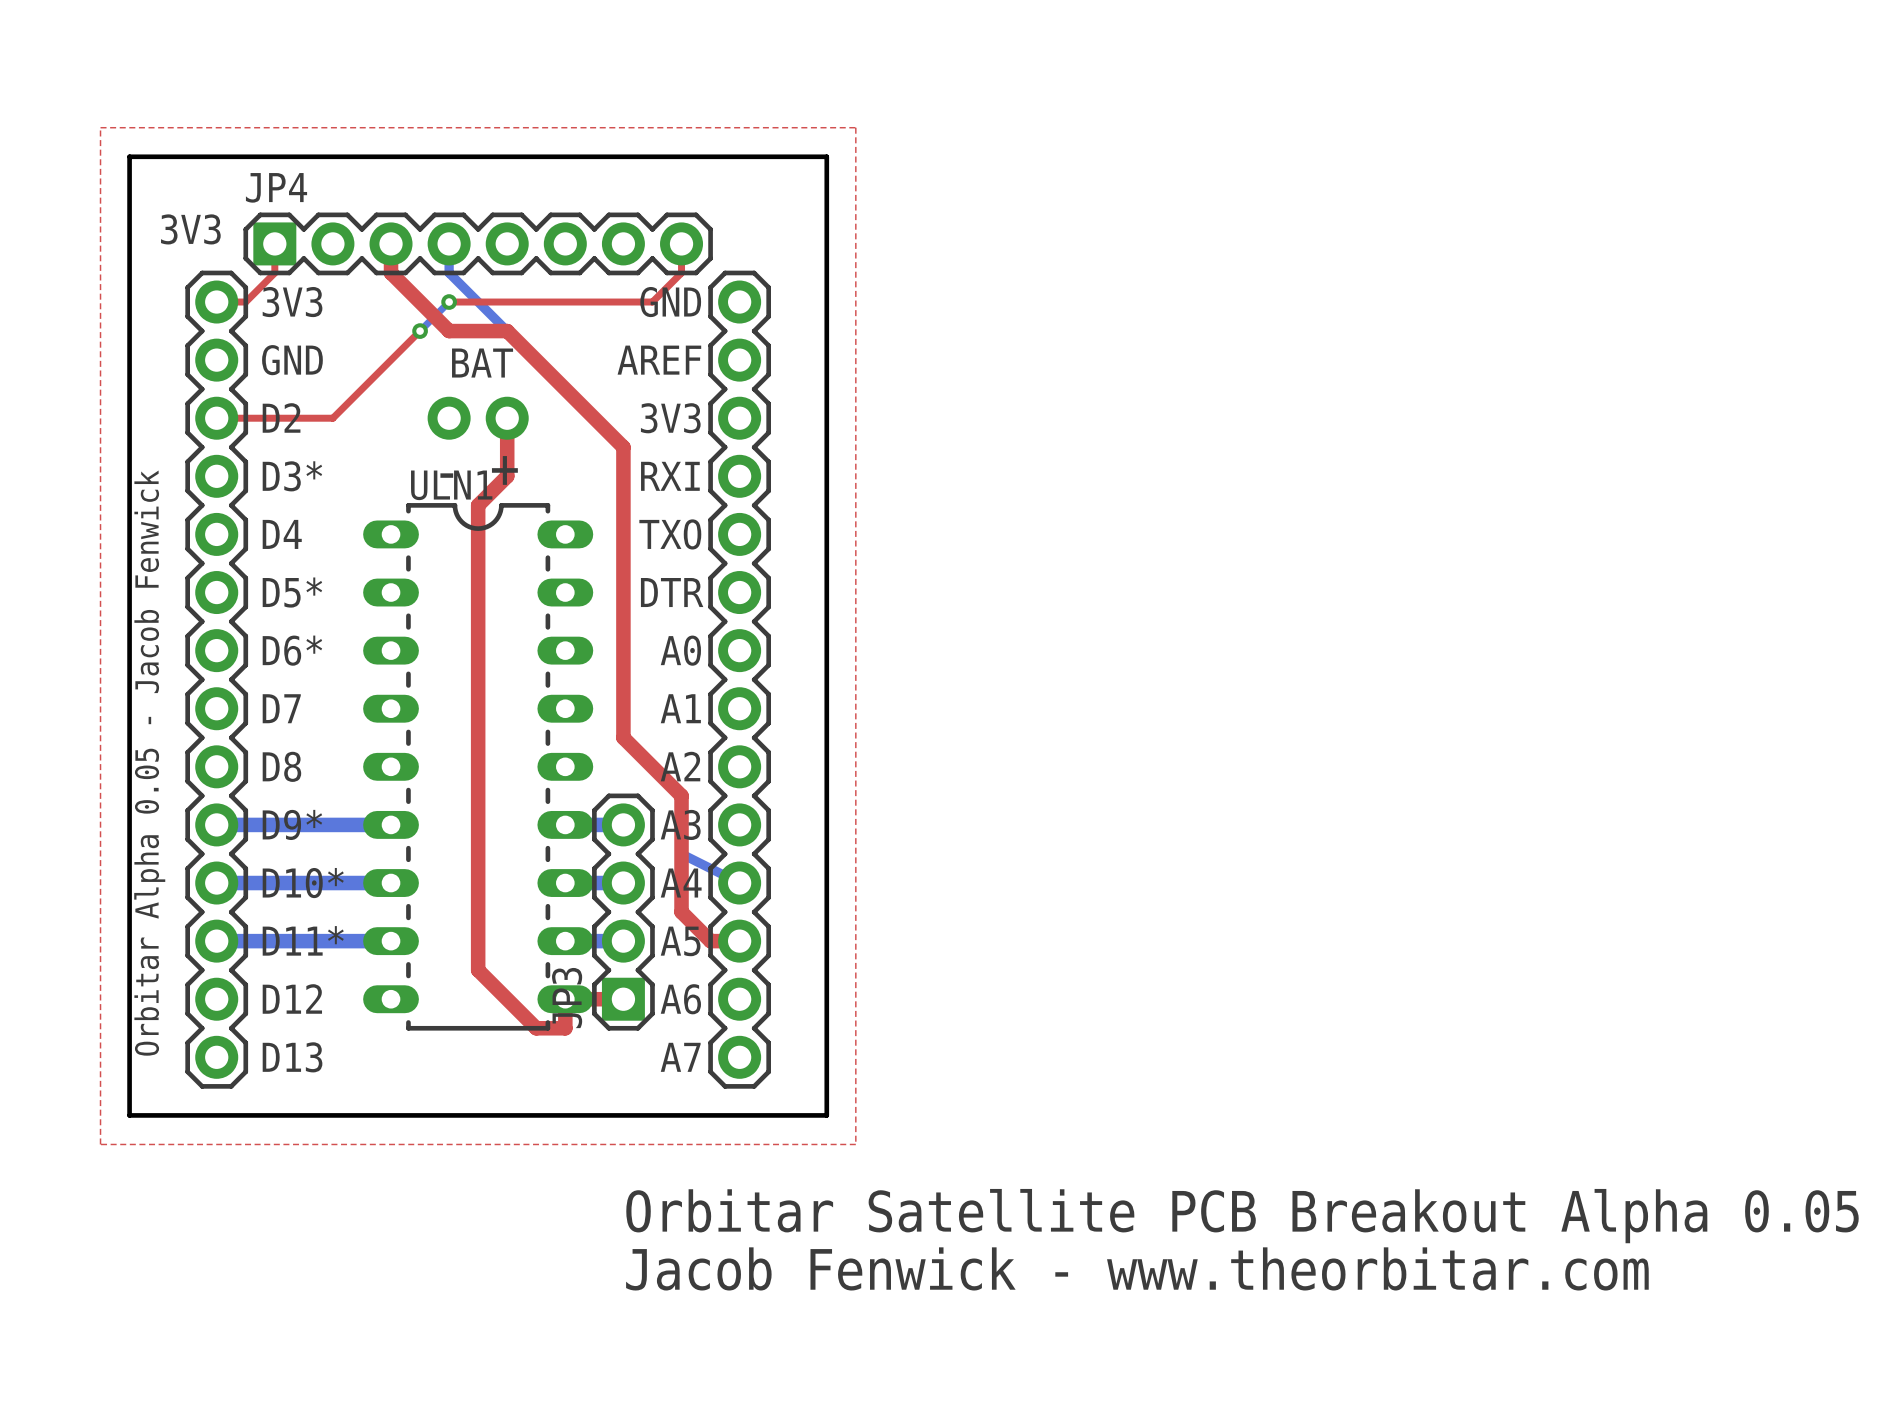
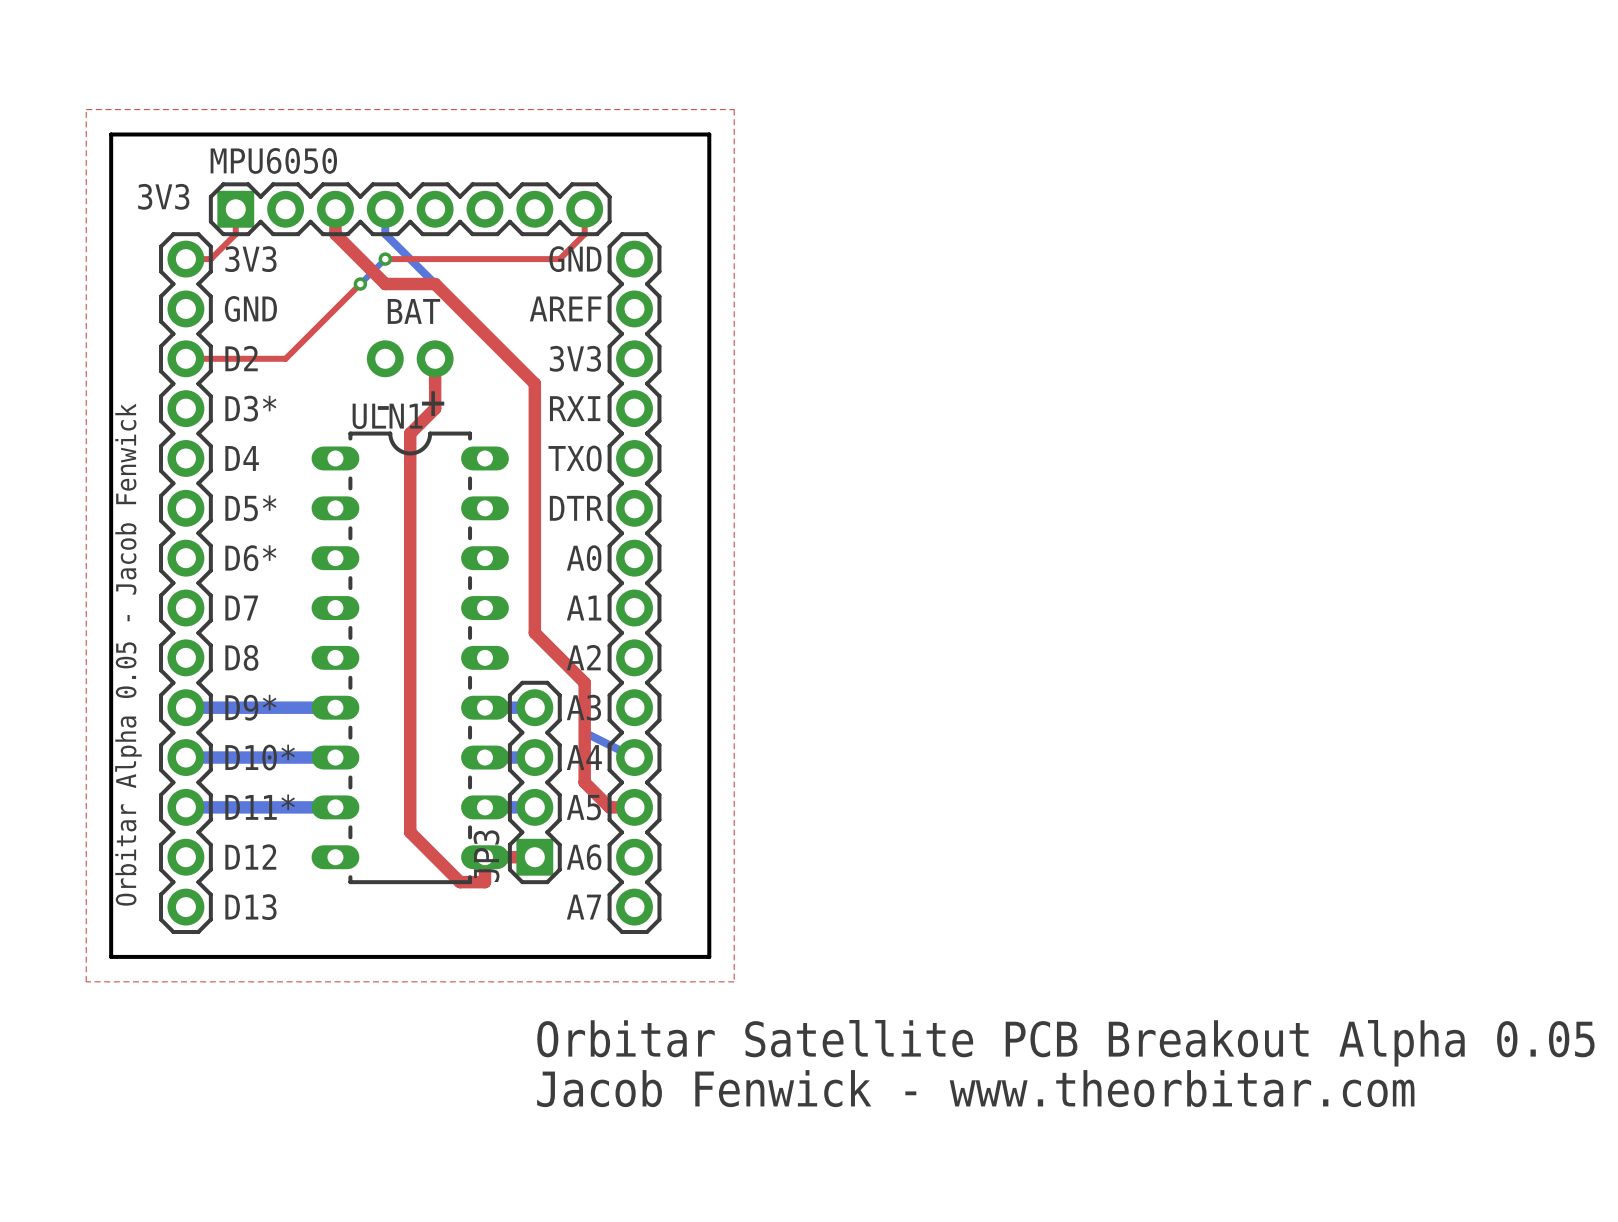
JP4 name: JP4 (276, 187) -> MPU6050 (273, 160)

